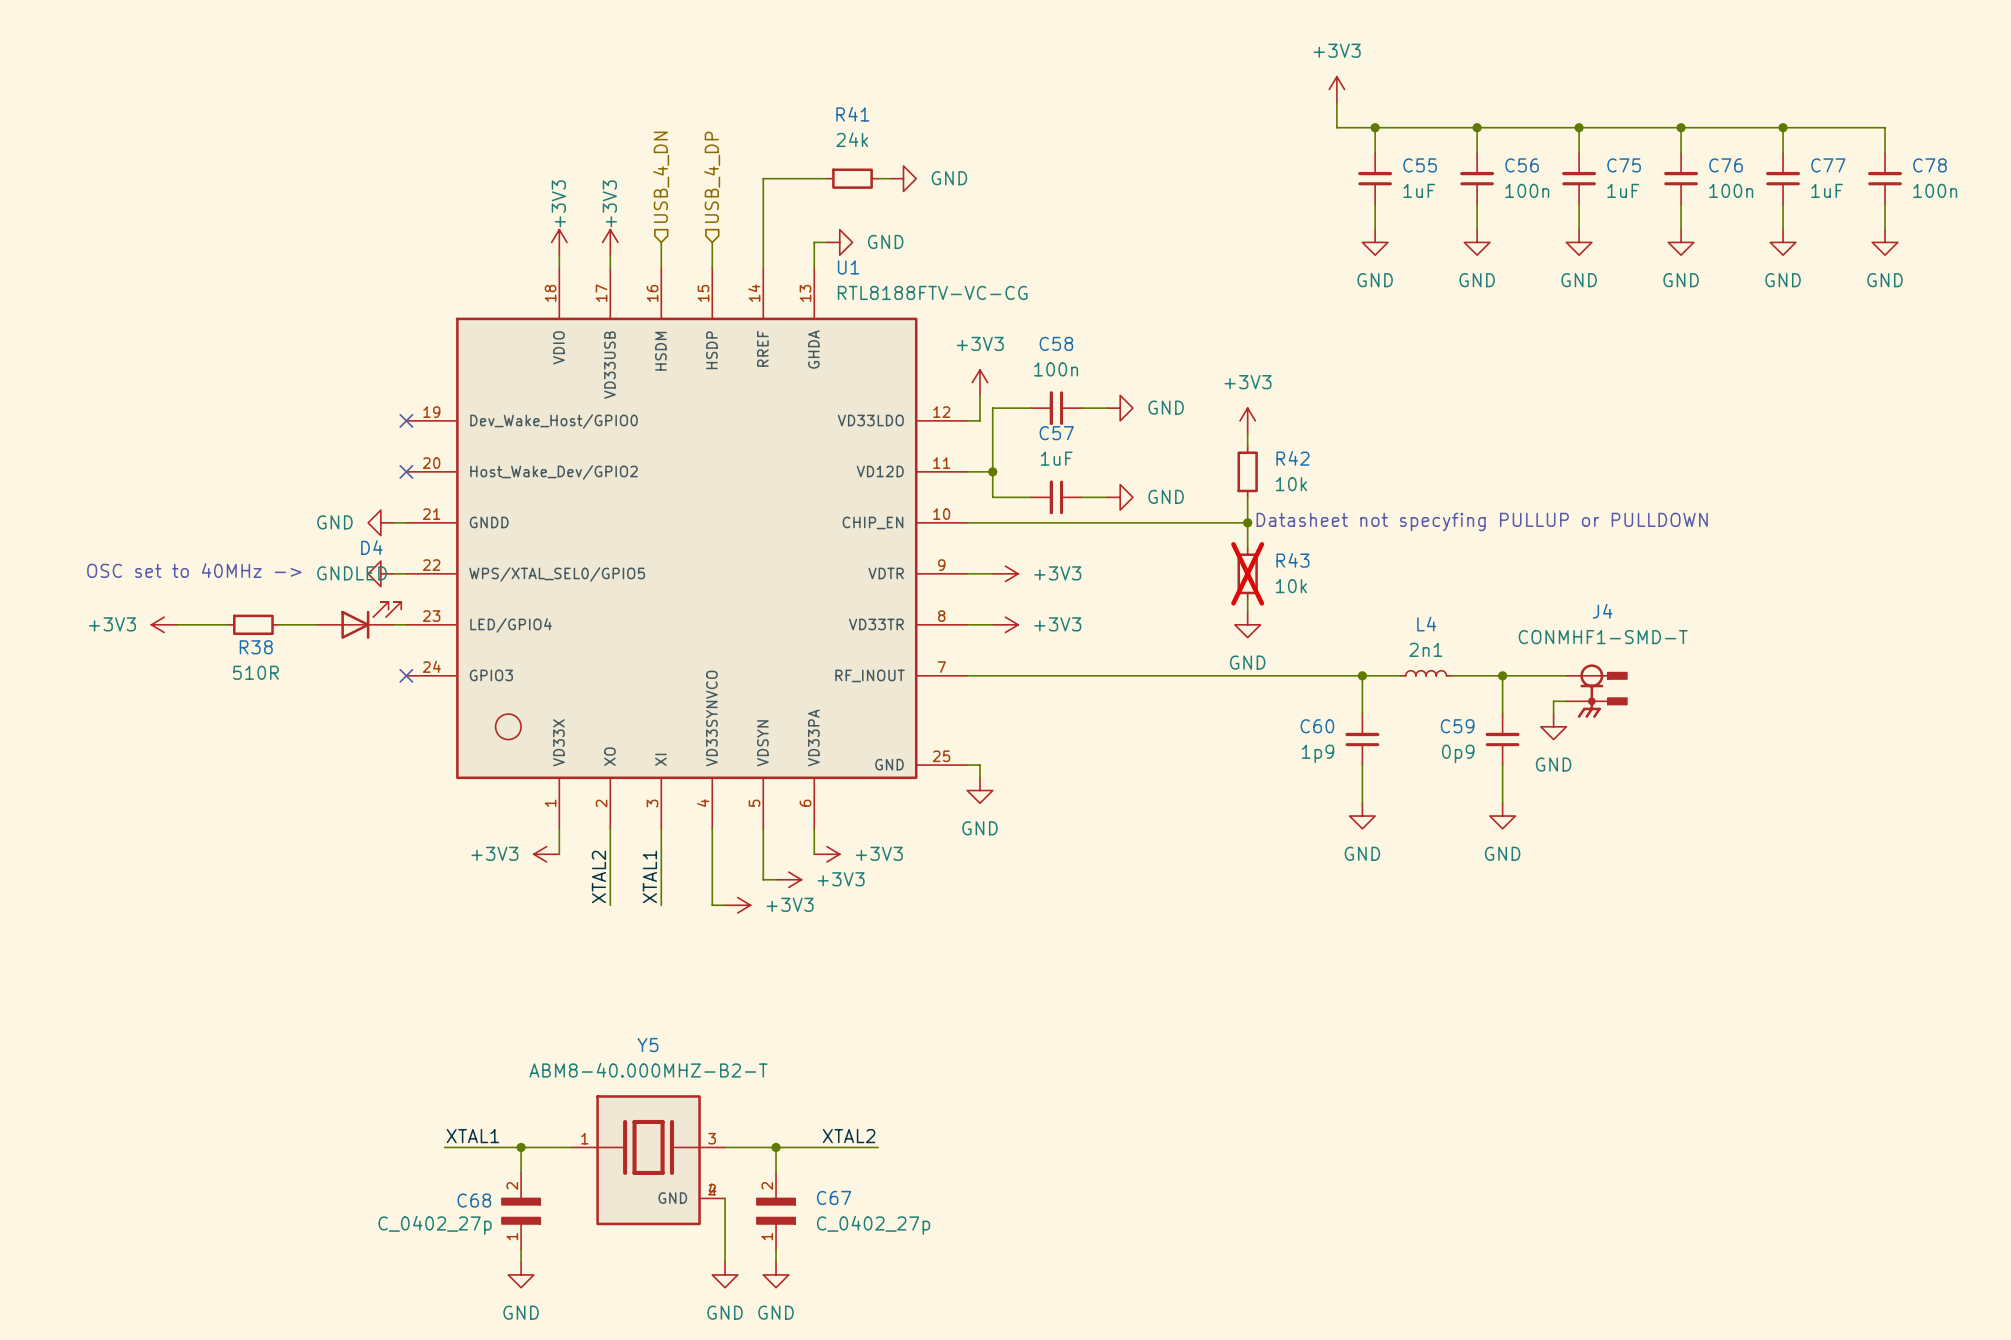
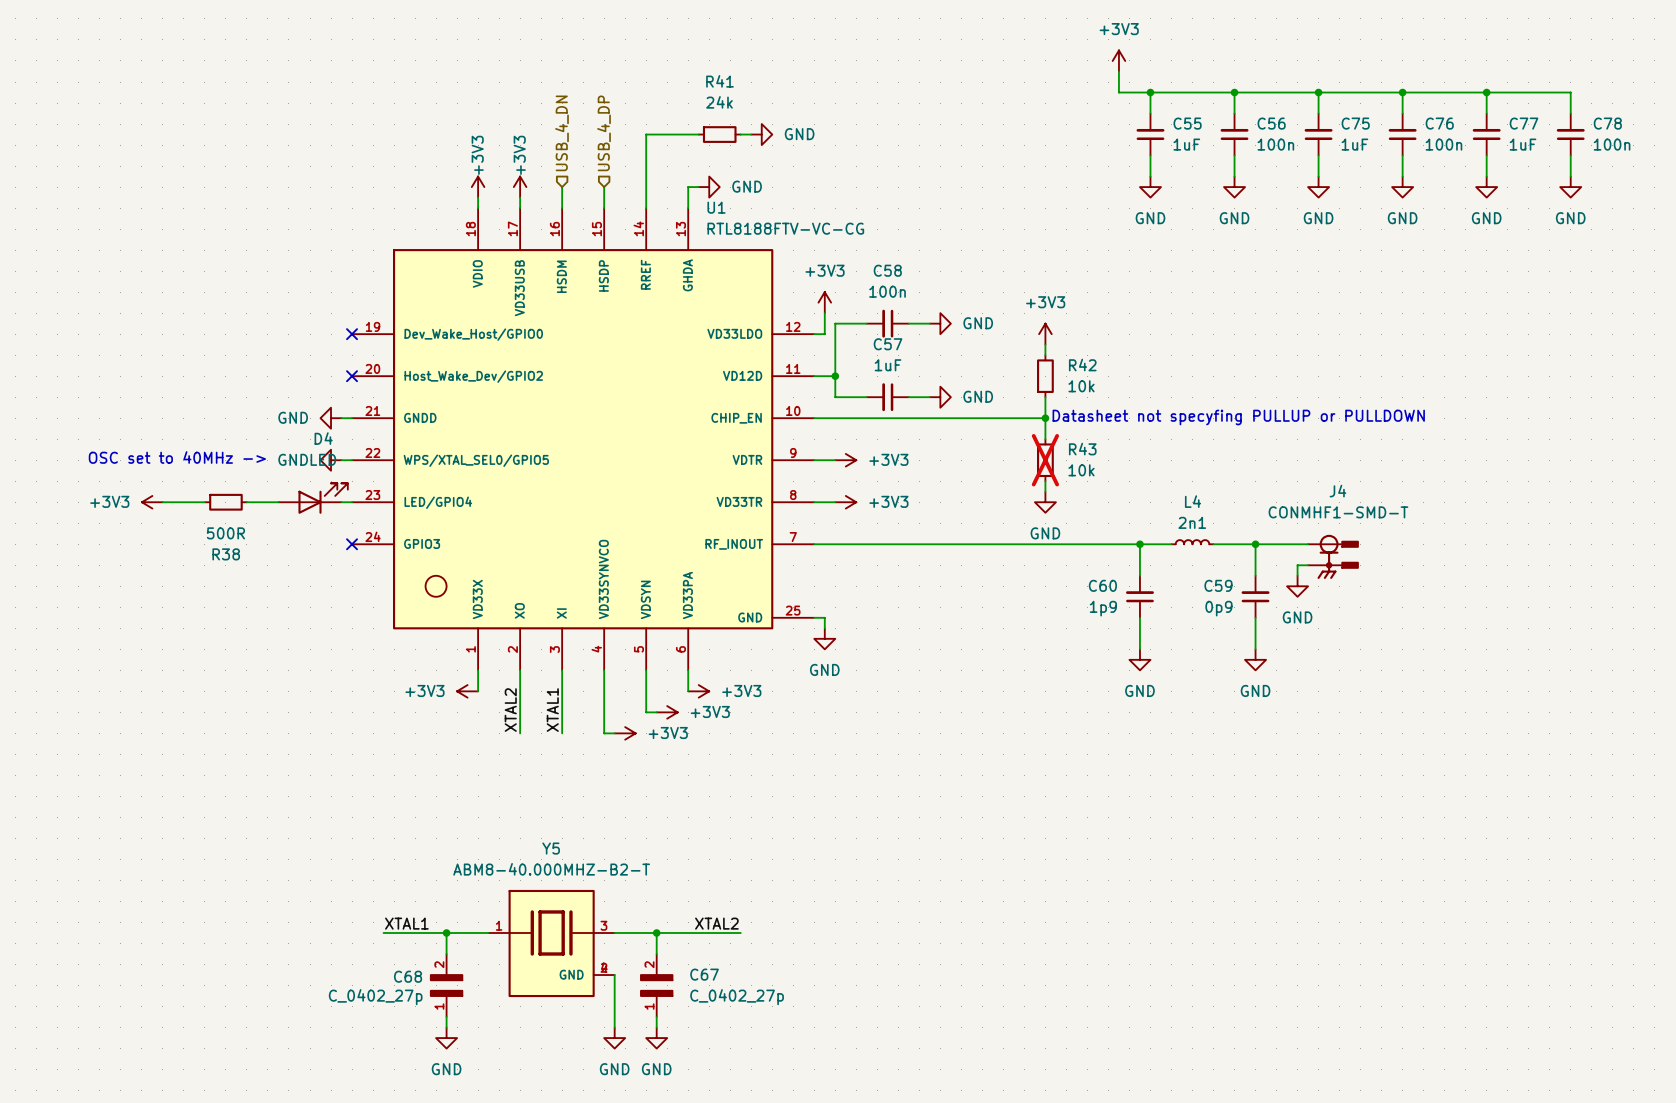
R38 name position: R38 (256, 647) -> R38 (226, 554)
R38 text: 510R (255, 672) -> 500R (225, 533)

